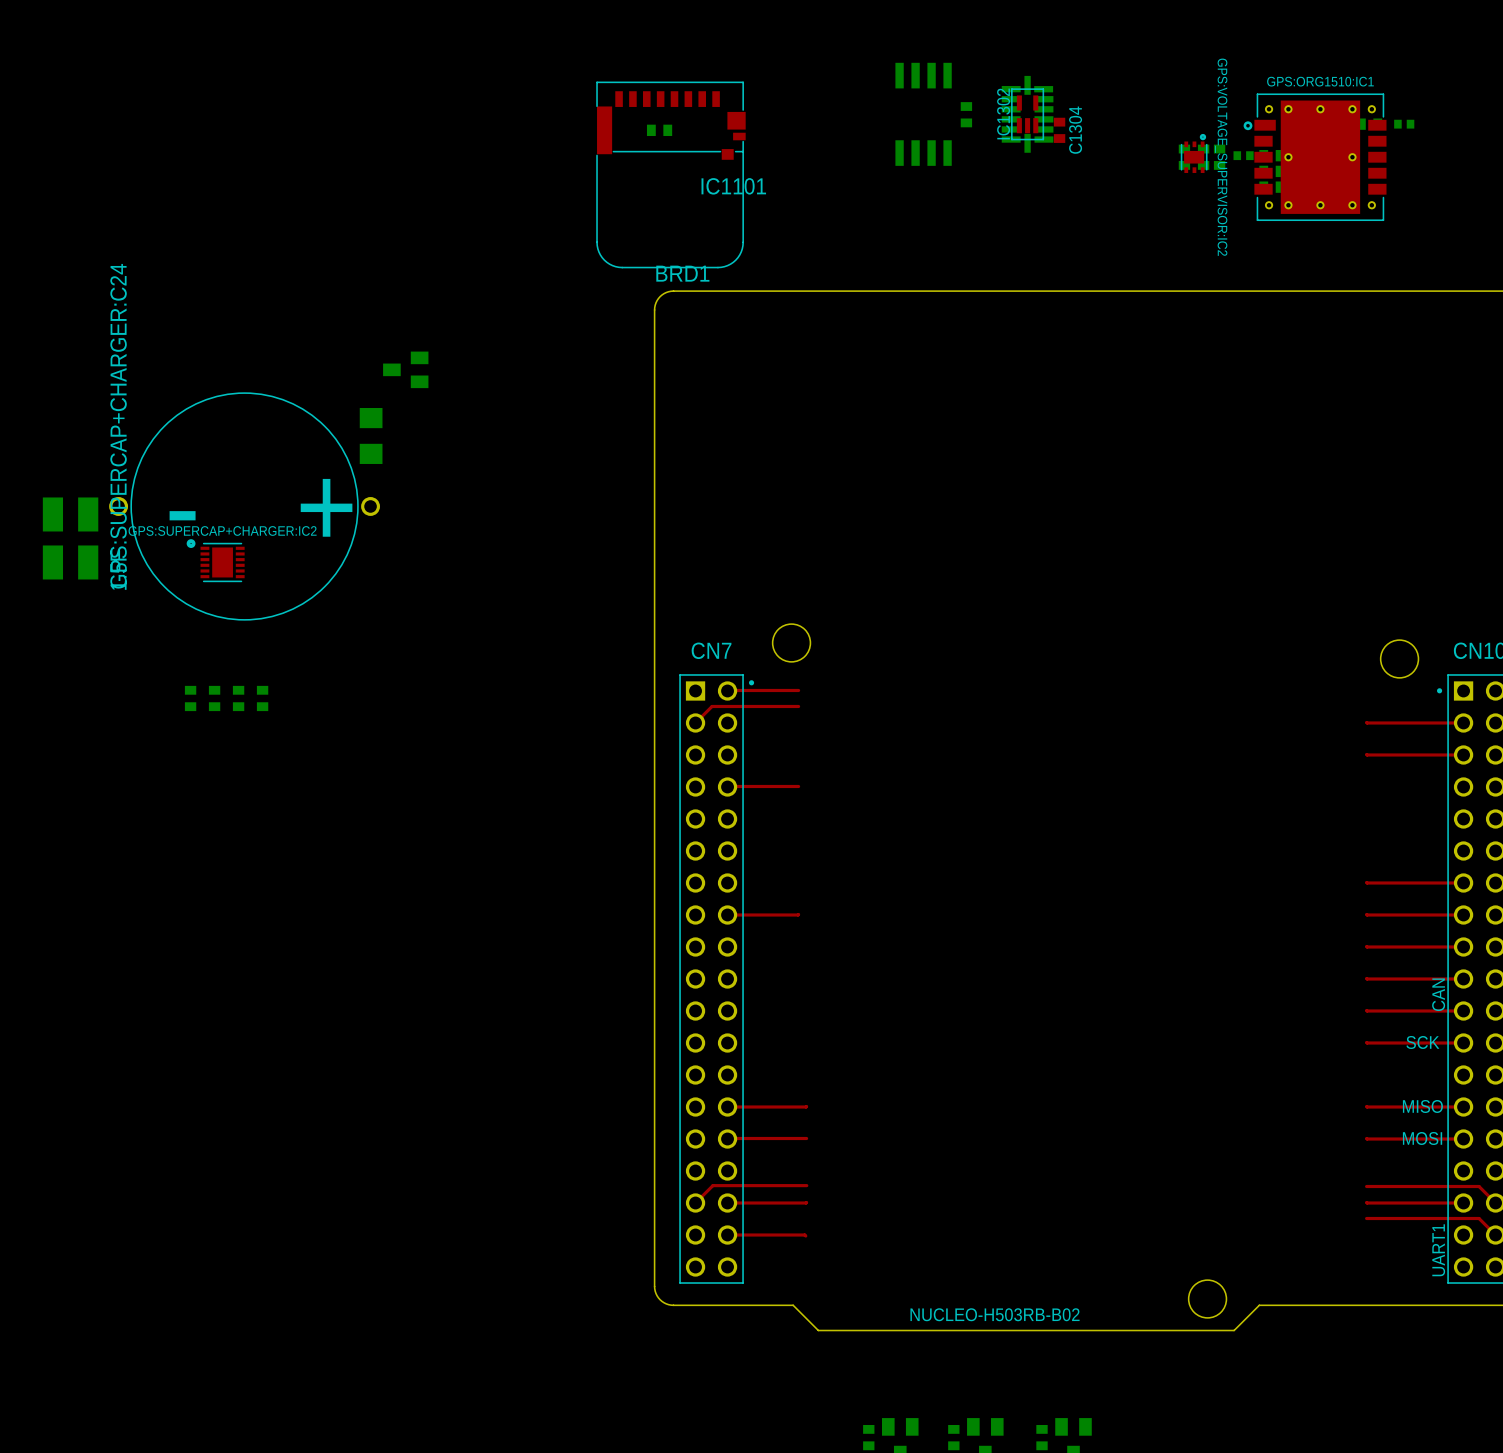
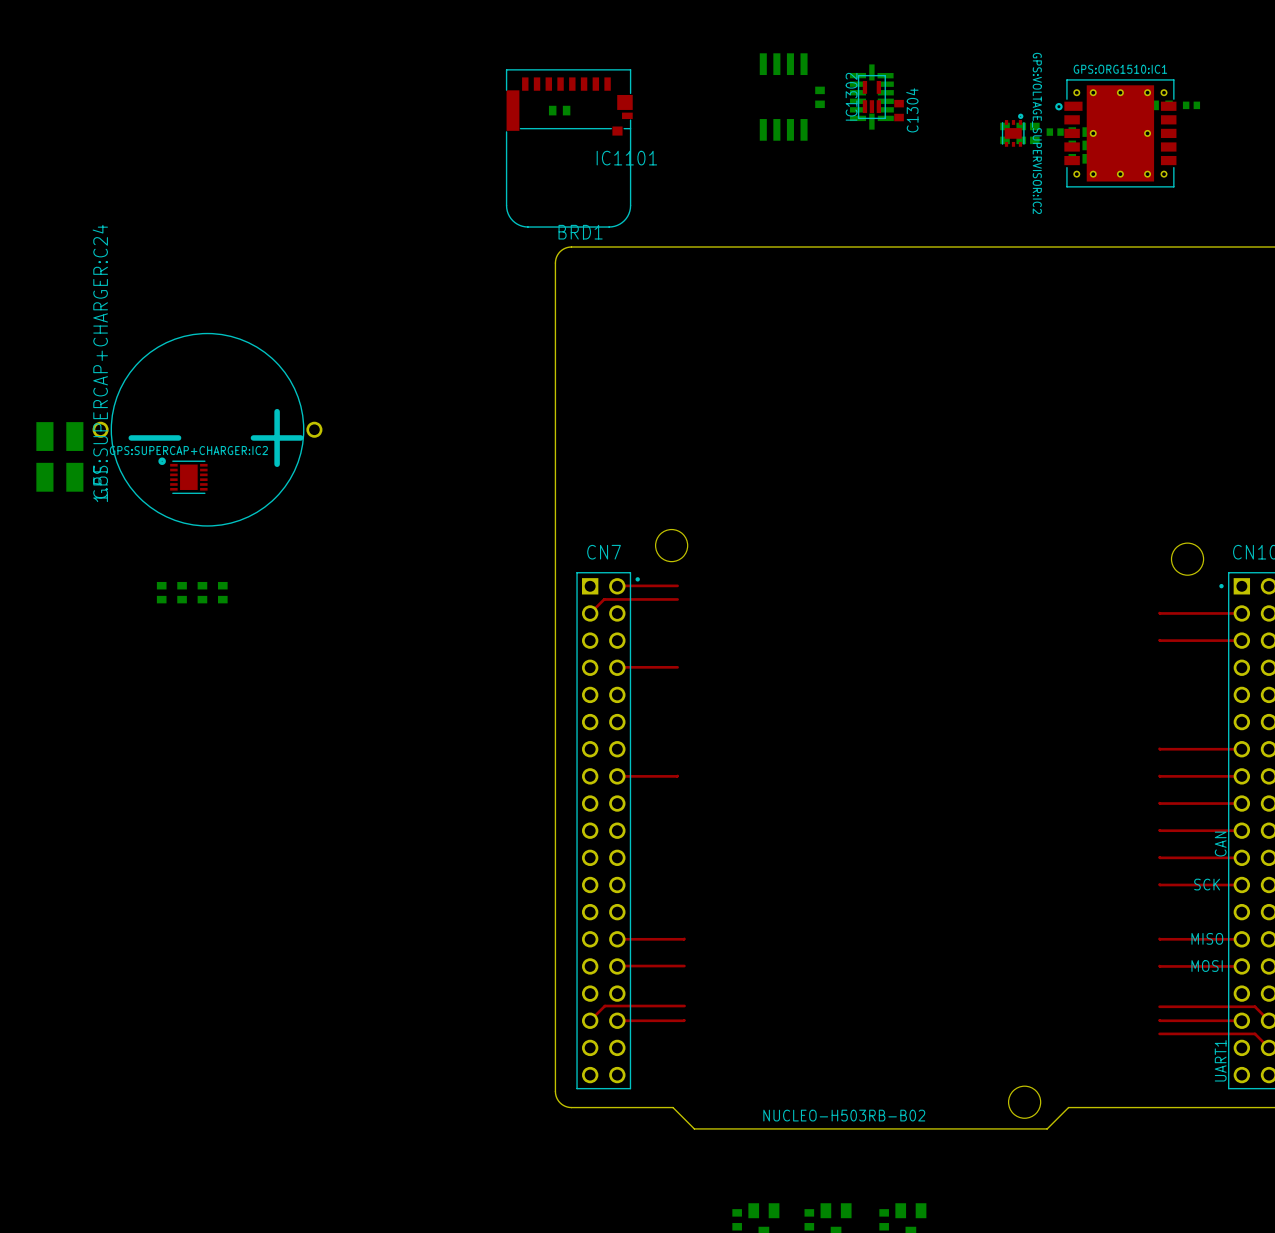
part: (405, 369) -> none
part: (371, 435) -> none
top track: (727, 1235) (805, 1236) -> none

